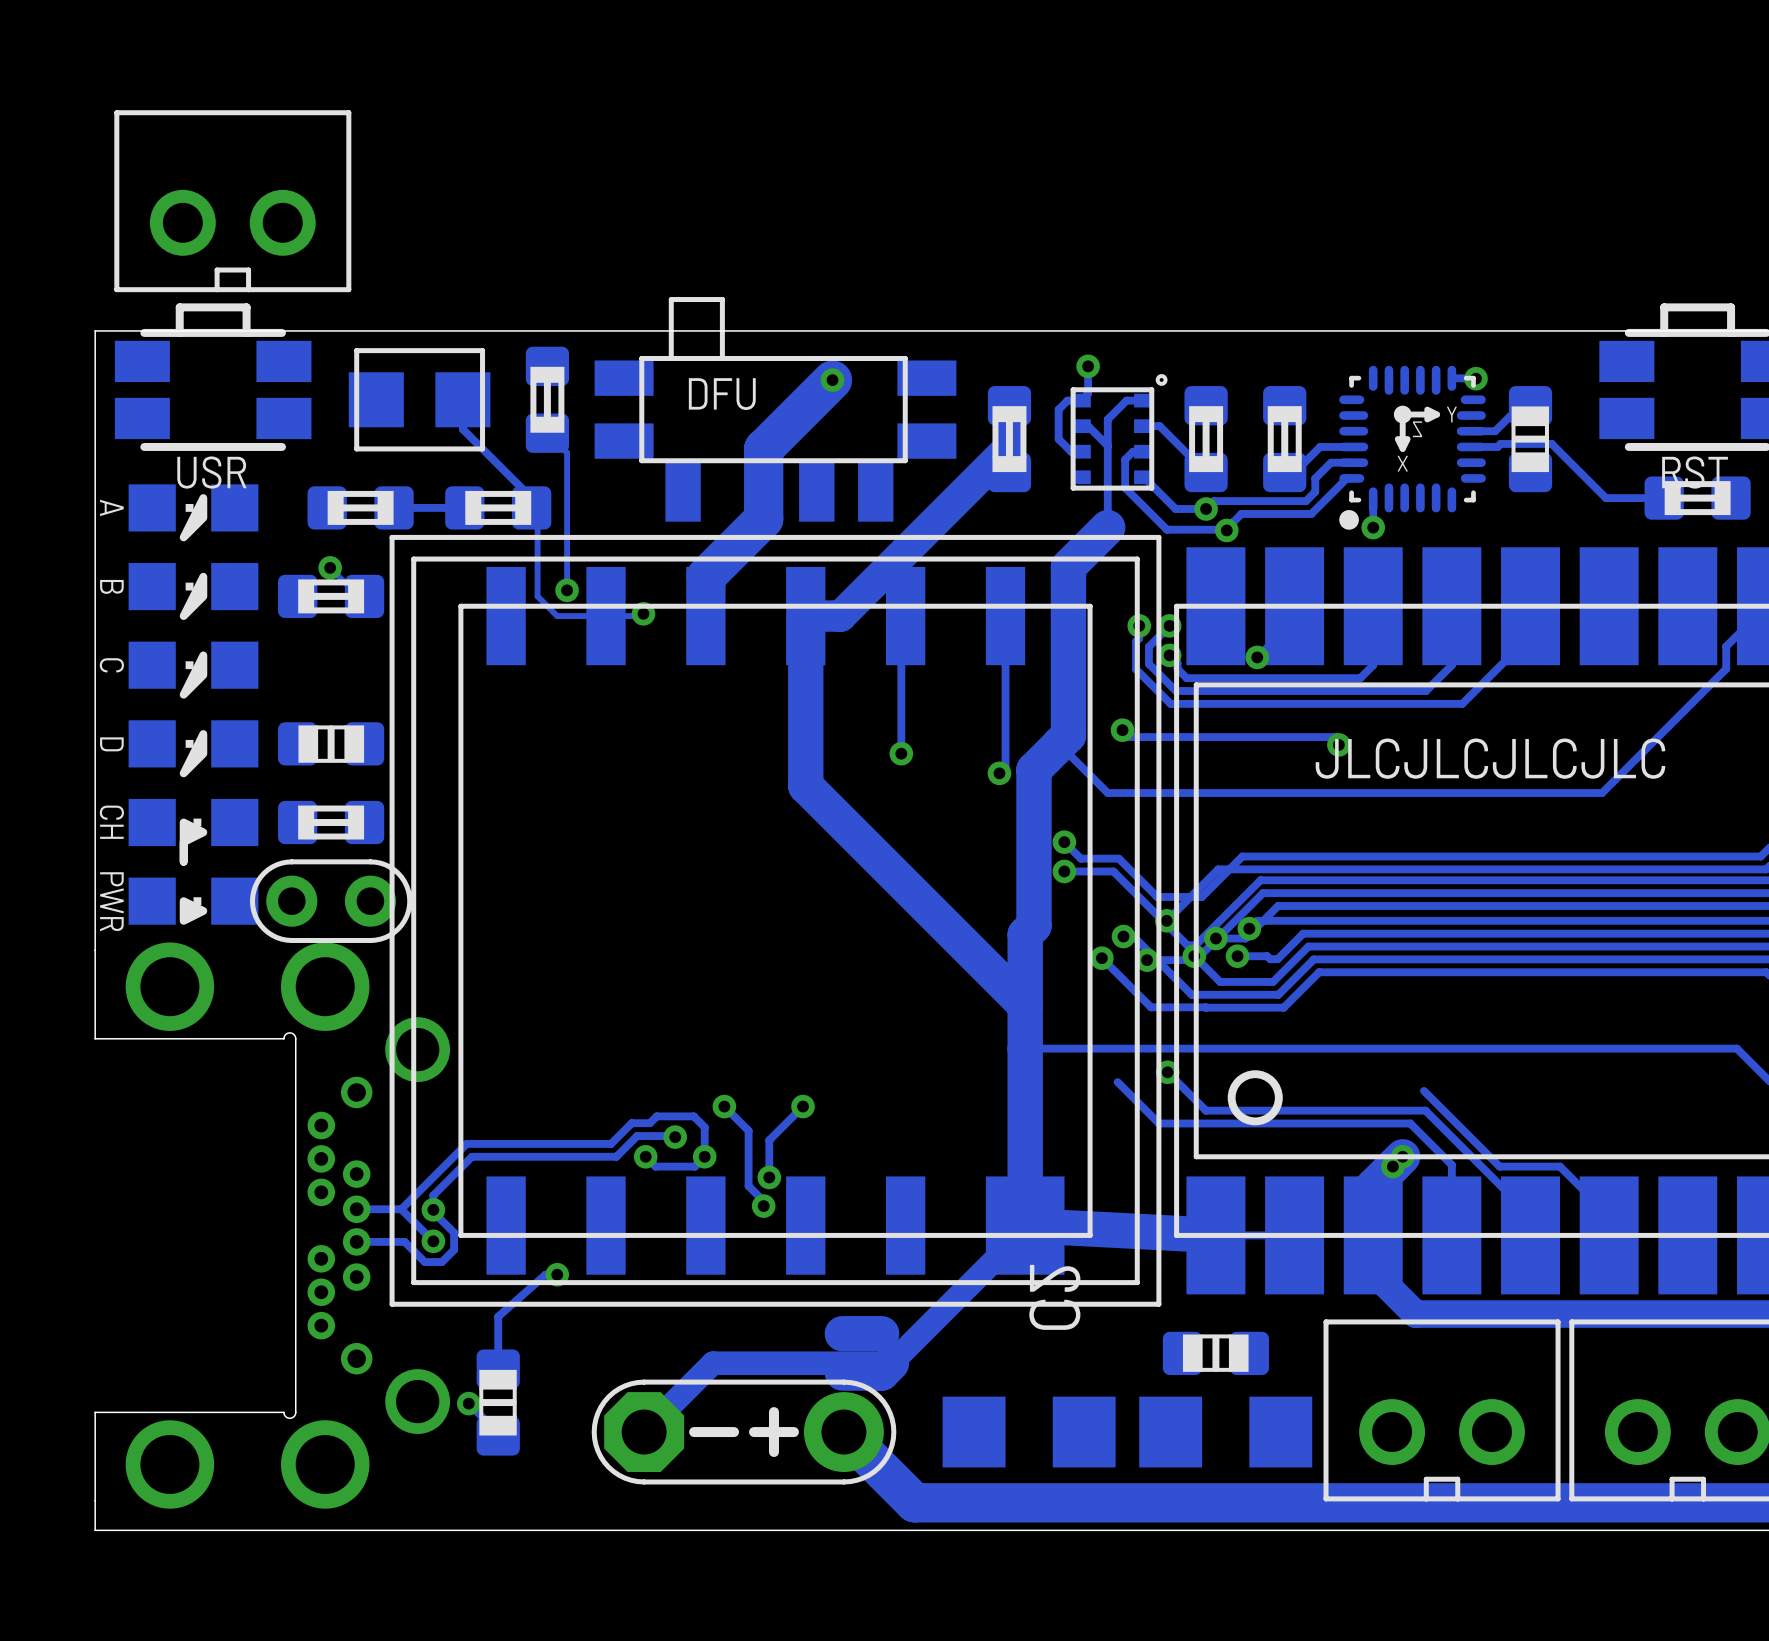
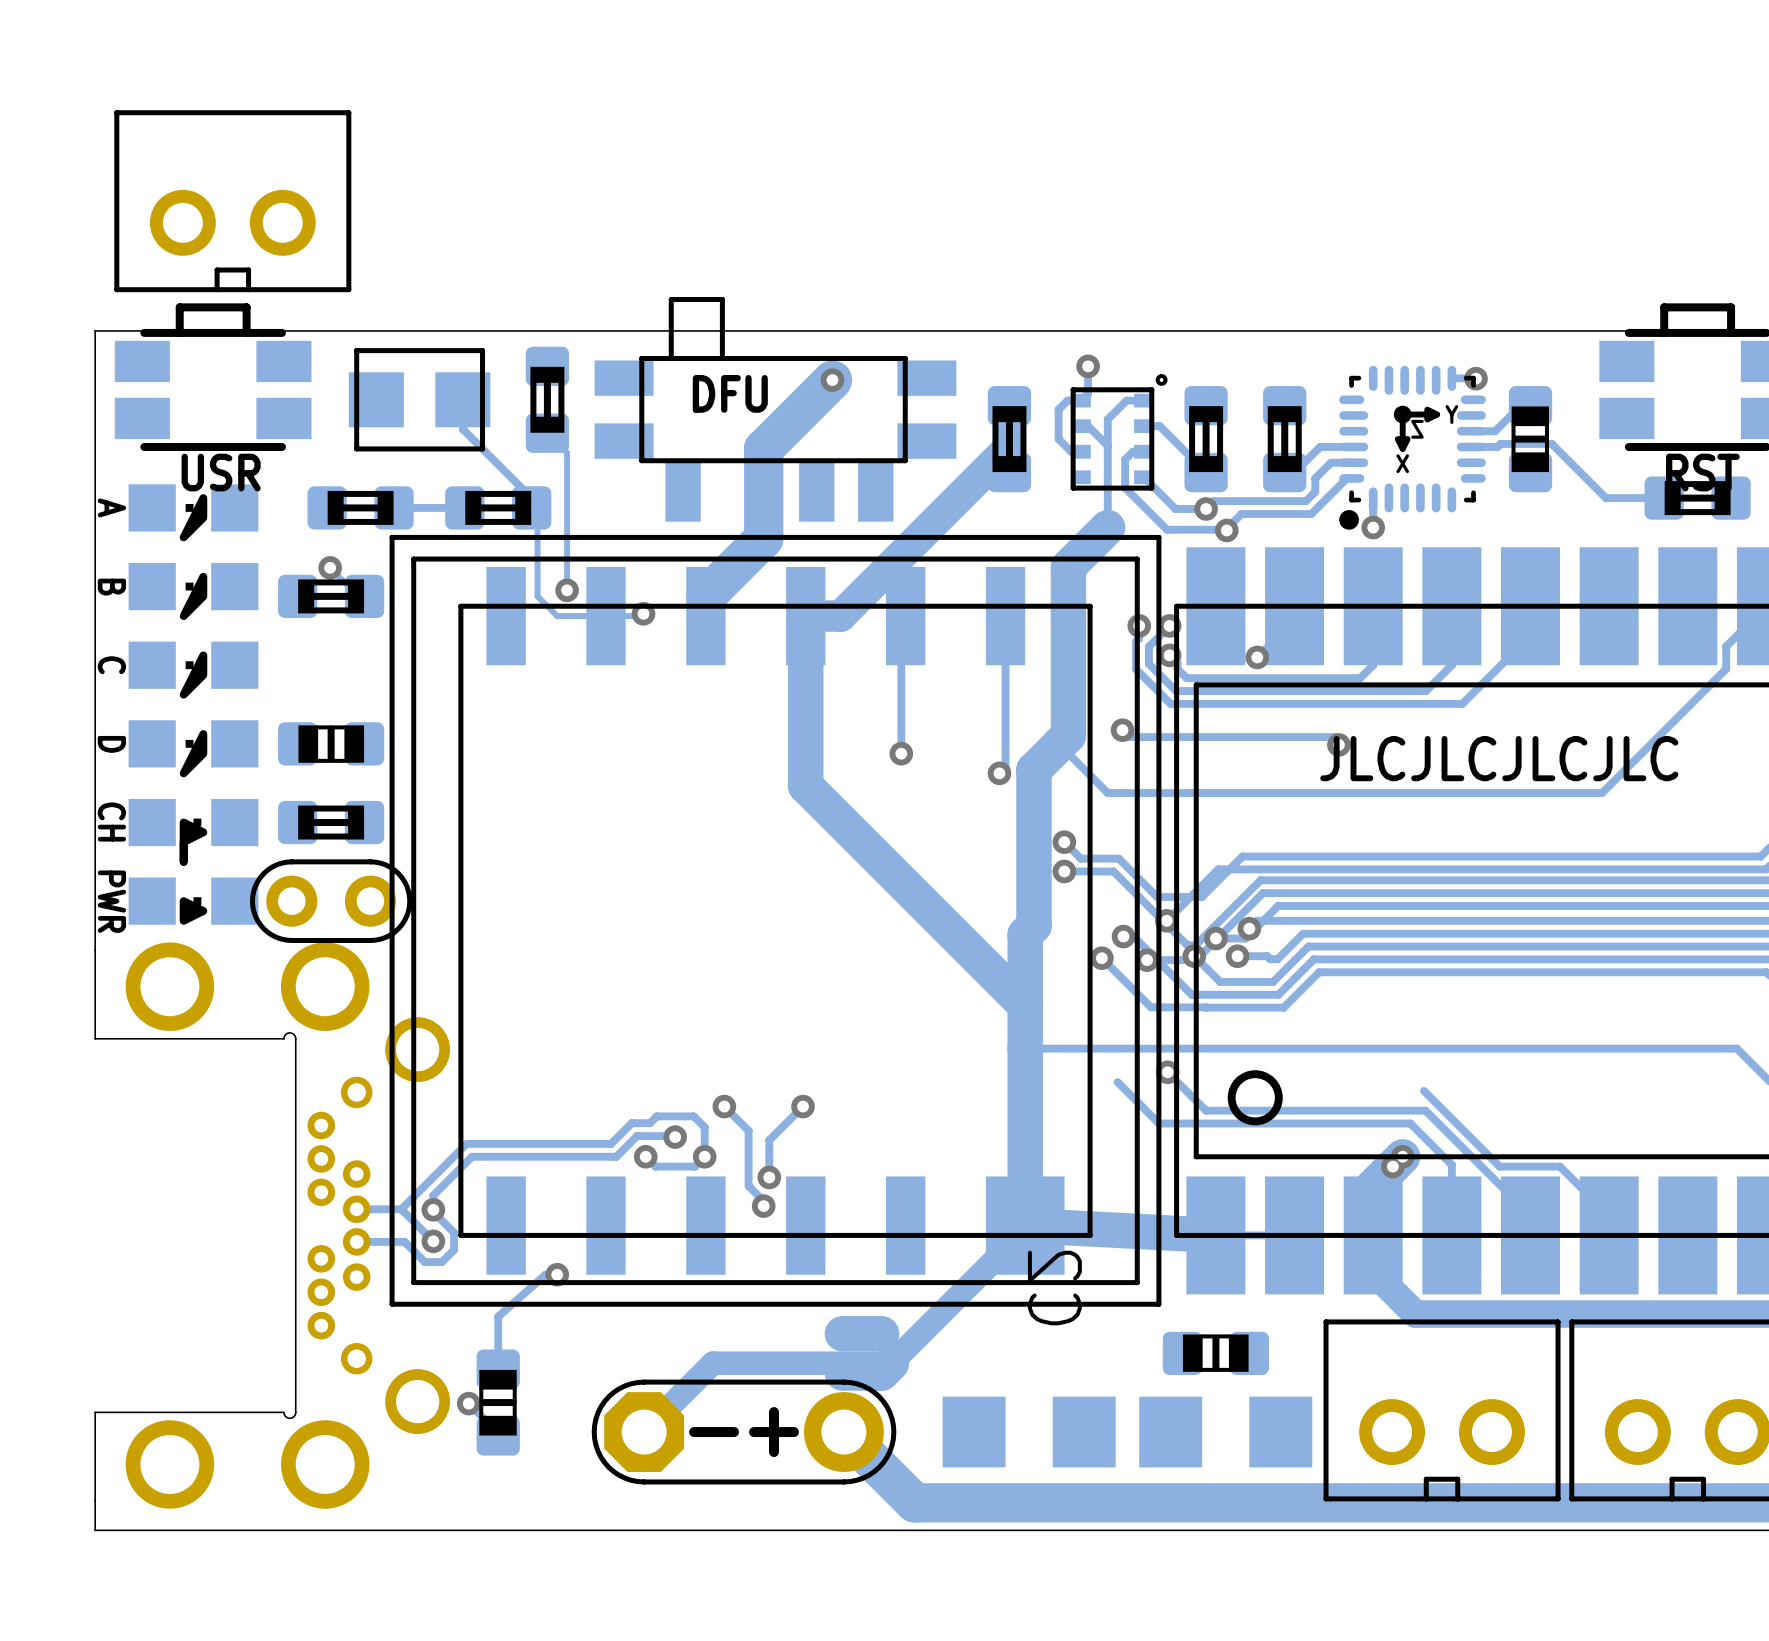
track: (763, 518) (705, 576) (705, 592) -> (763, 518) (763, 538) (705, 596)

